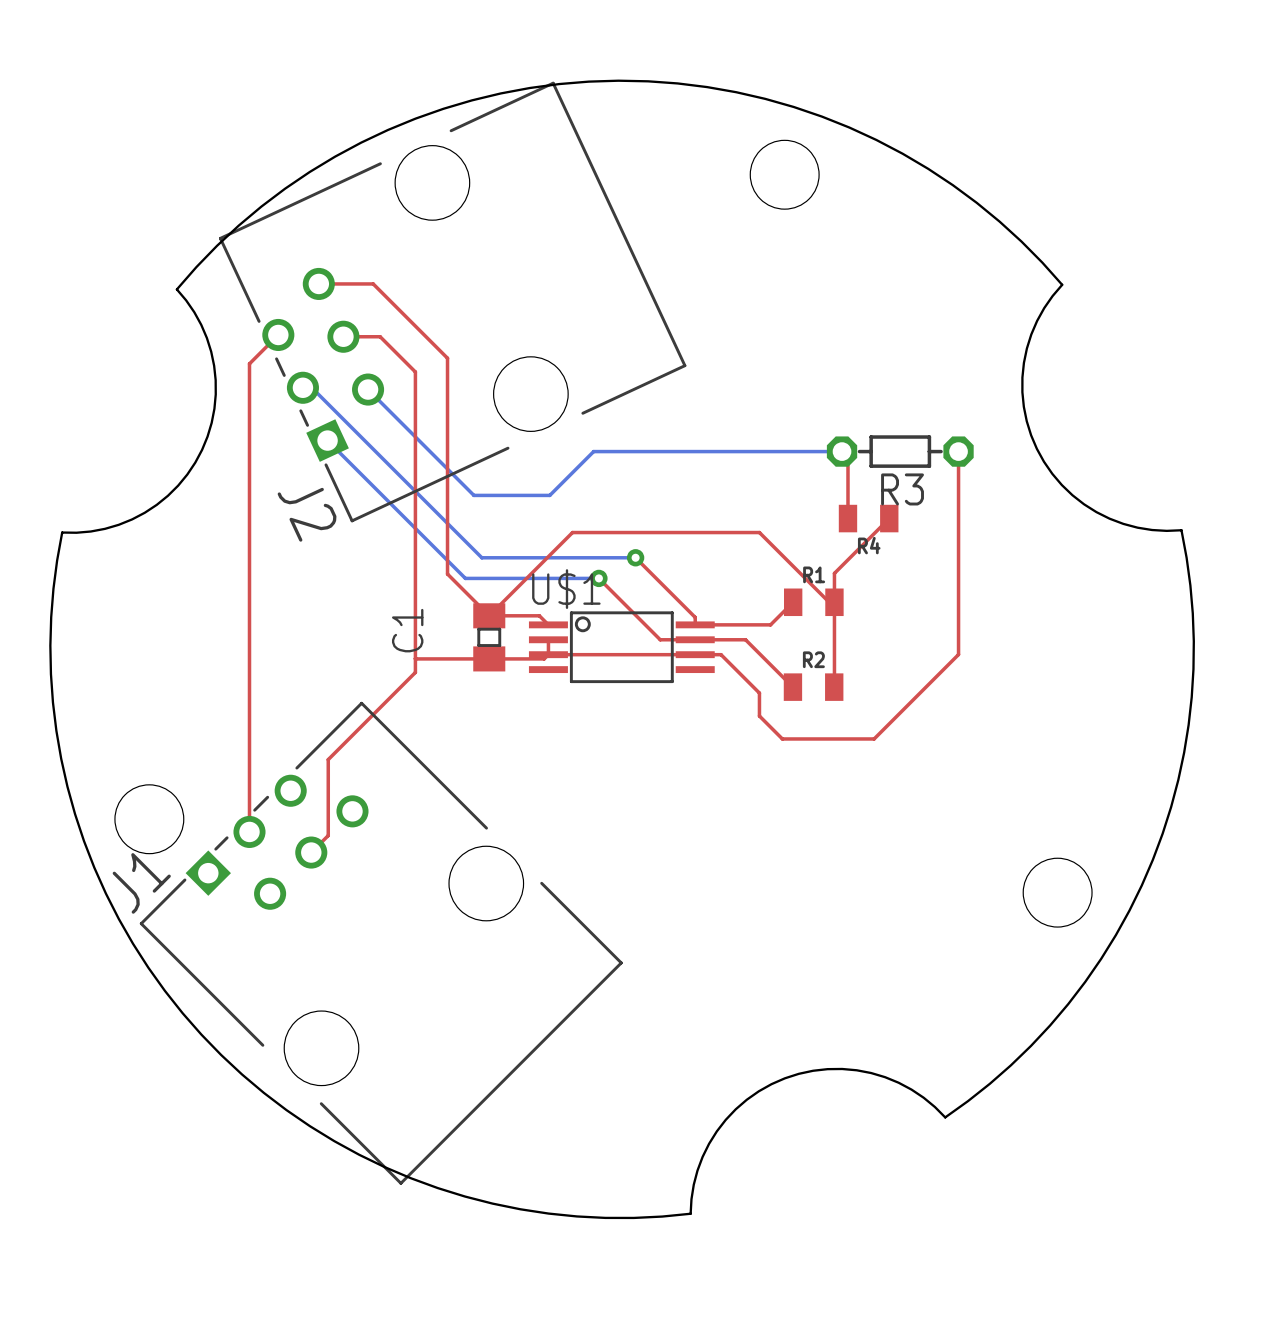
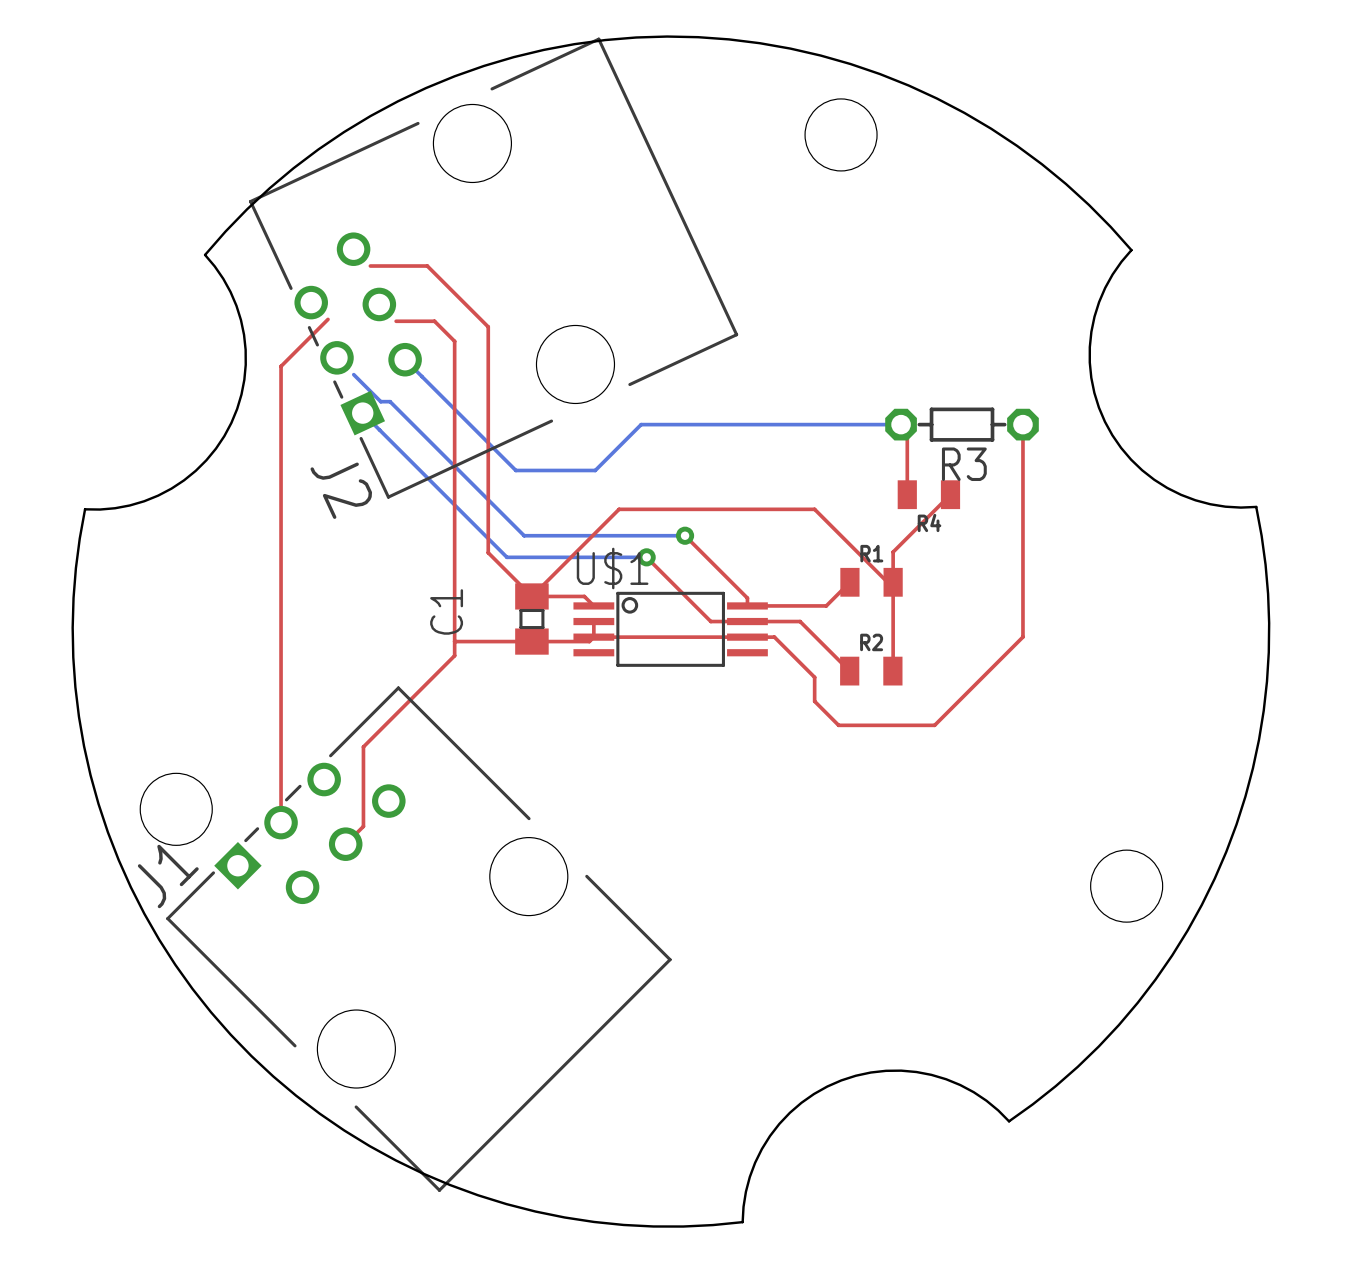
top track: (318, 283) (373, 283) (389, 300) -> (370, 266) (427, 266)
top track: (278, 334) (249, 363) (249, 395) -> (328, 319) (281, 366)
top track: (343, 336) (380, 336) (396, 352) -> (396, 321) (434, 321)
bottom track: (302, 387) (311, 387) (353, 429) -> (353, 374) (380, 401) (390, 401)

